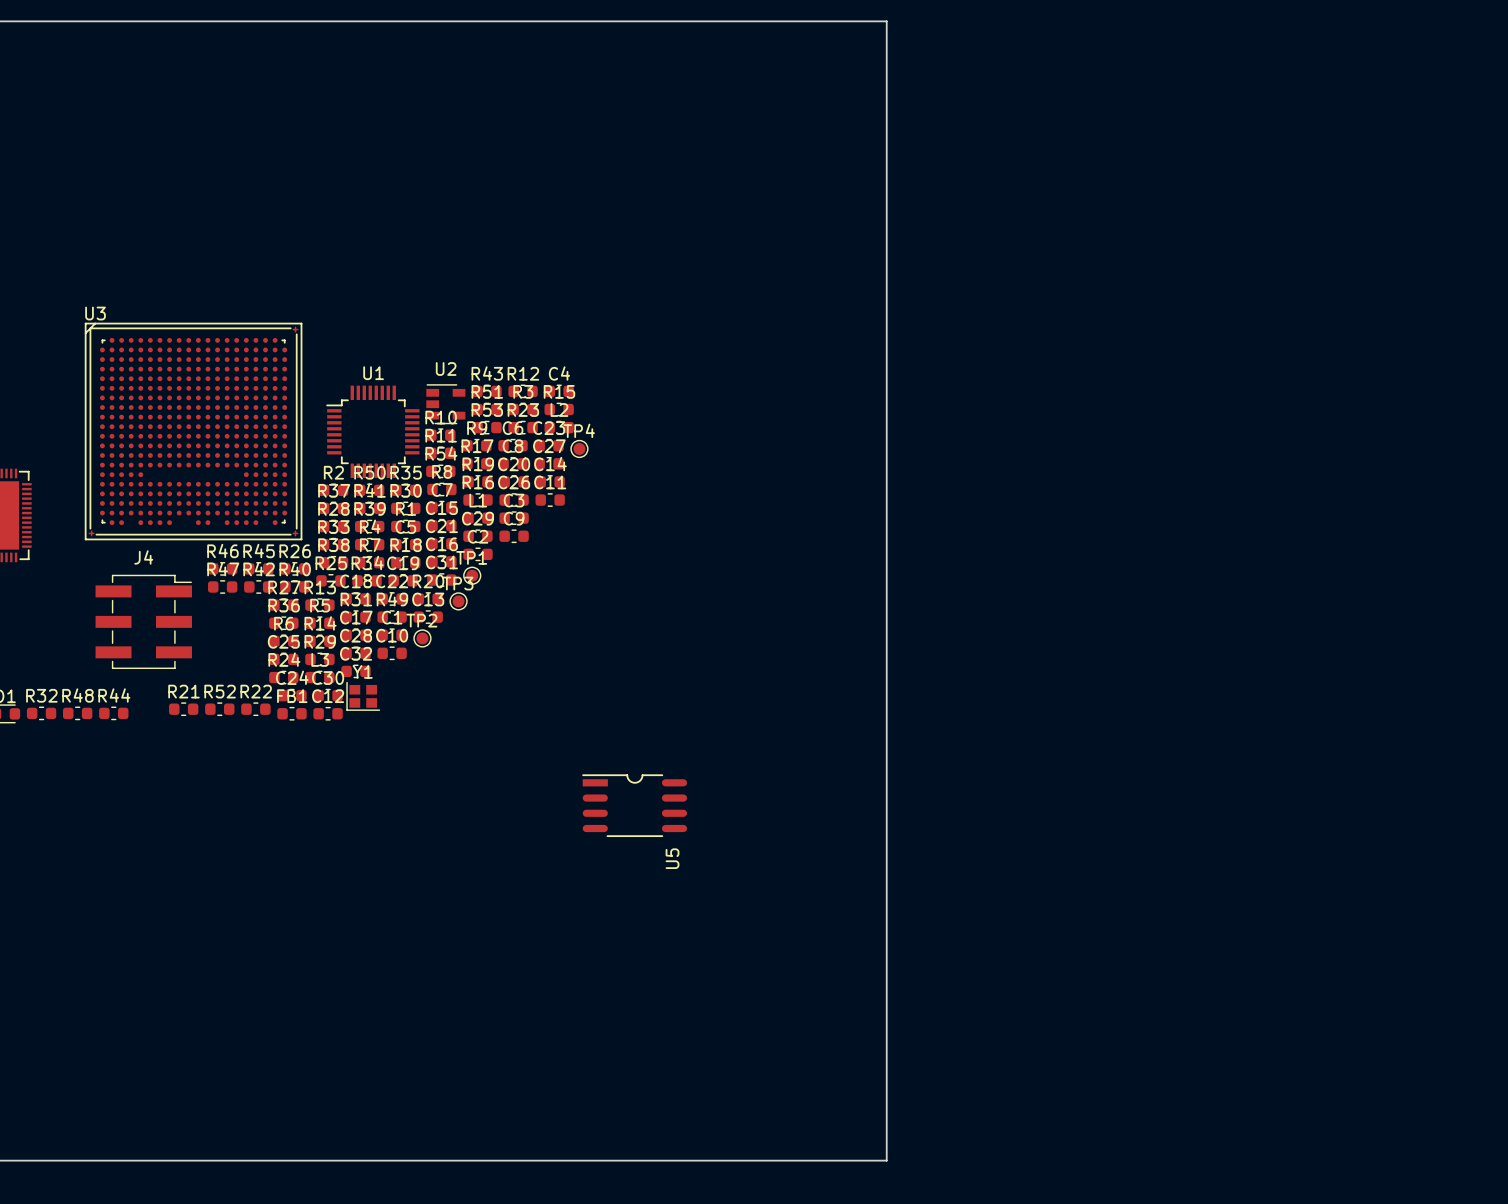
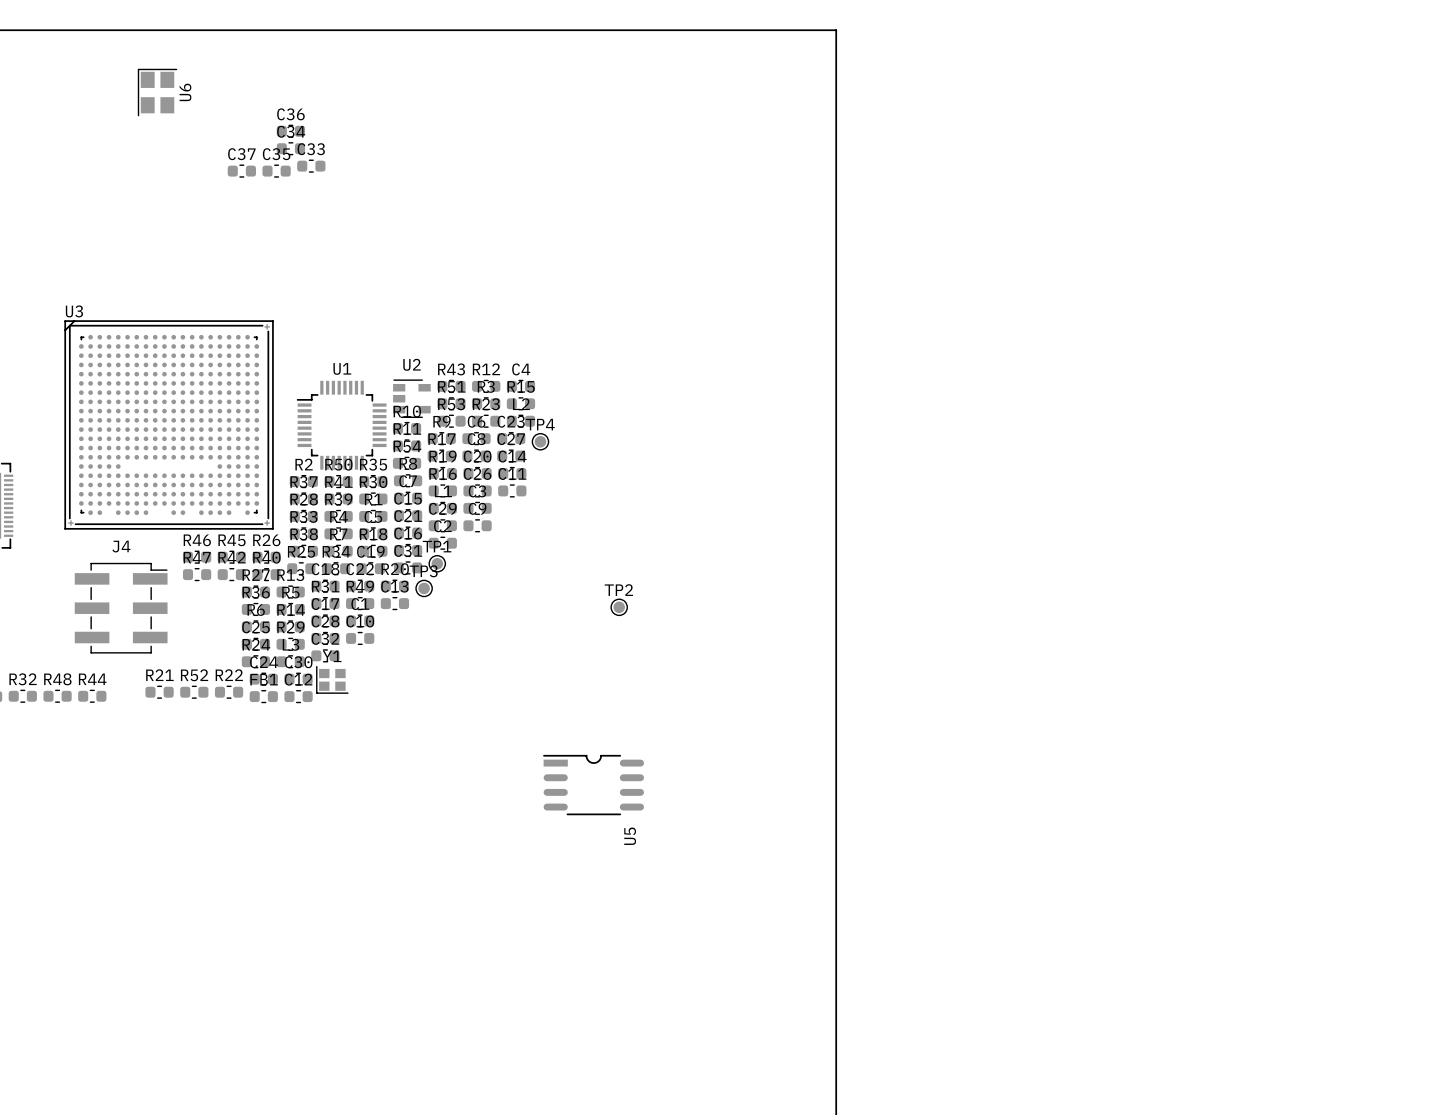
U6: none -> (157, 92)
C36: none -> (290, 131)
C34: none -> (290, 148)
C33: none -> (311, 166)
C37: none -> (241, 171)
C35: none -> (276, 171)
TP2 position: (422, 638) -> (619, 607)

